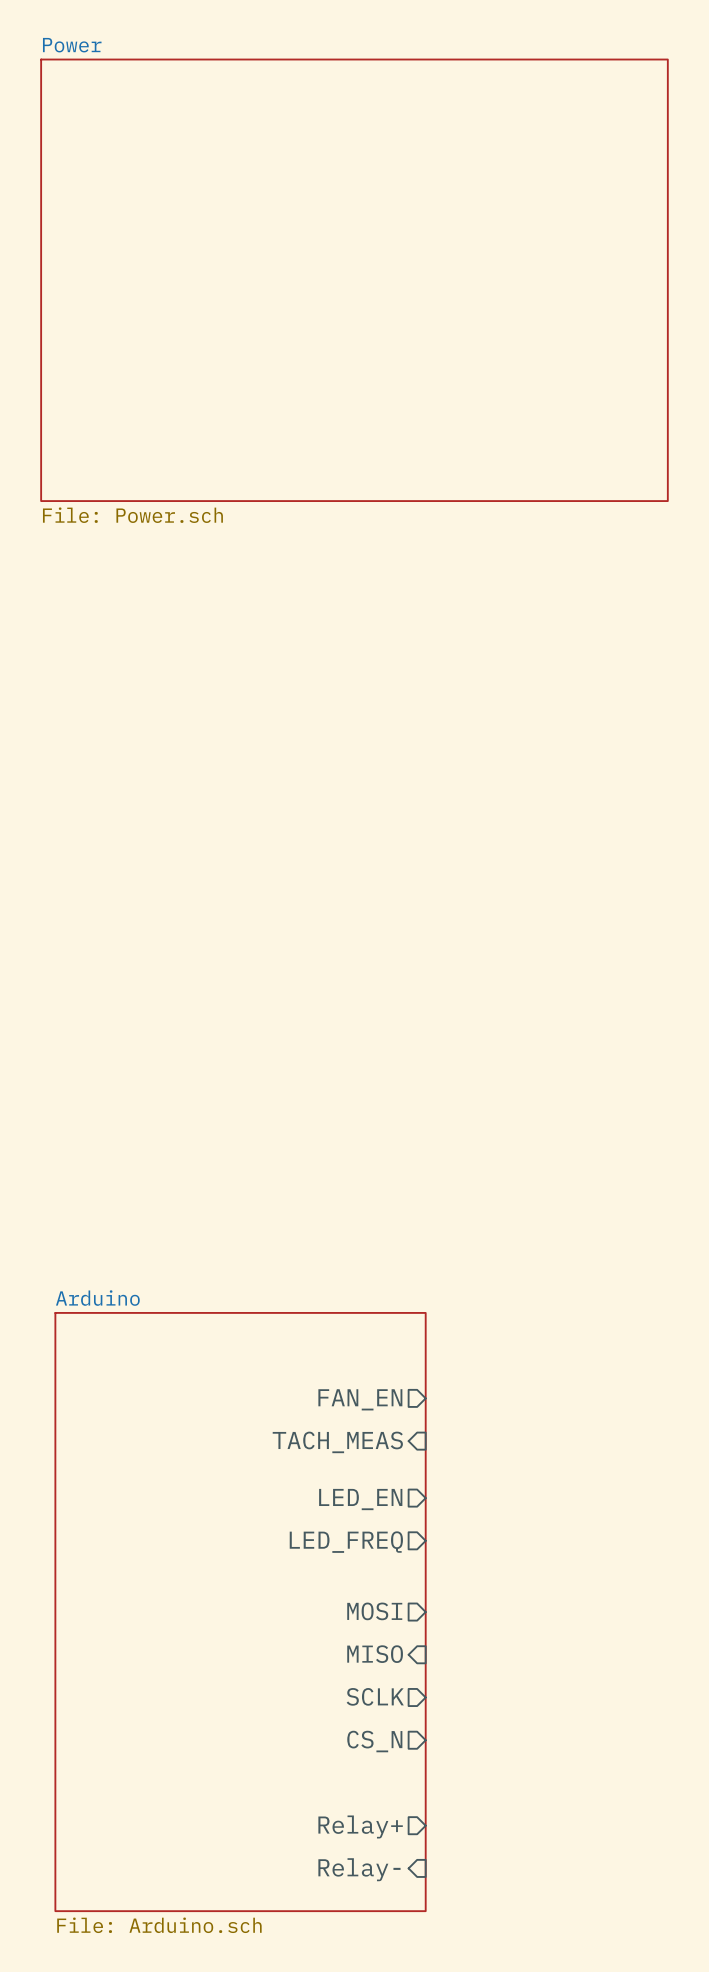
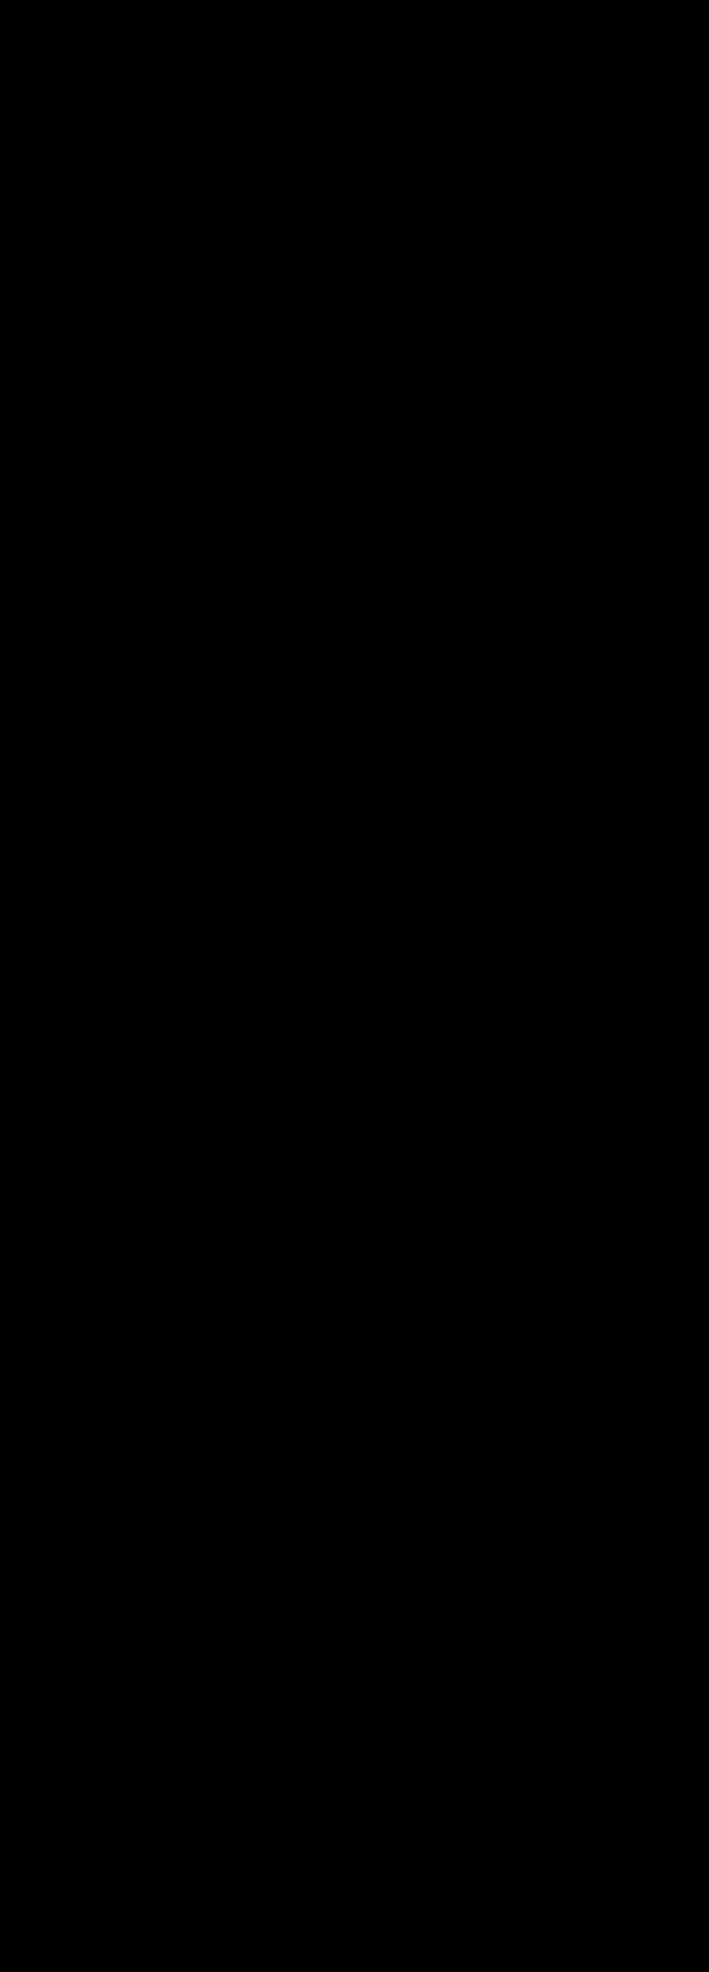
sheet Power: File: Power.sch (354, 280) -> none
sheet pin: FAN_EN (360, 1399) -> none
sheet pin: TACH_MEAS (337, 1442) -> none
sheet pin: LED_EN (360, 1499) -> none
sheet pin: LED_FREQ (346, 1542) -> none
sheet pin: MOSI (374, 1611) -> none
sheet Arduino: File: Arduino.sch (240, 1612) -> none
sheet pin: MISO (375, 1654) -> none
sheet pin: SCLK (375, 1696) -> none
sheet pin: CS_N (374, 1741) -> none
sheet pin: Relay+ (360, 1826) -> none
sheet pin: Relay- (359, 1869) -> none

